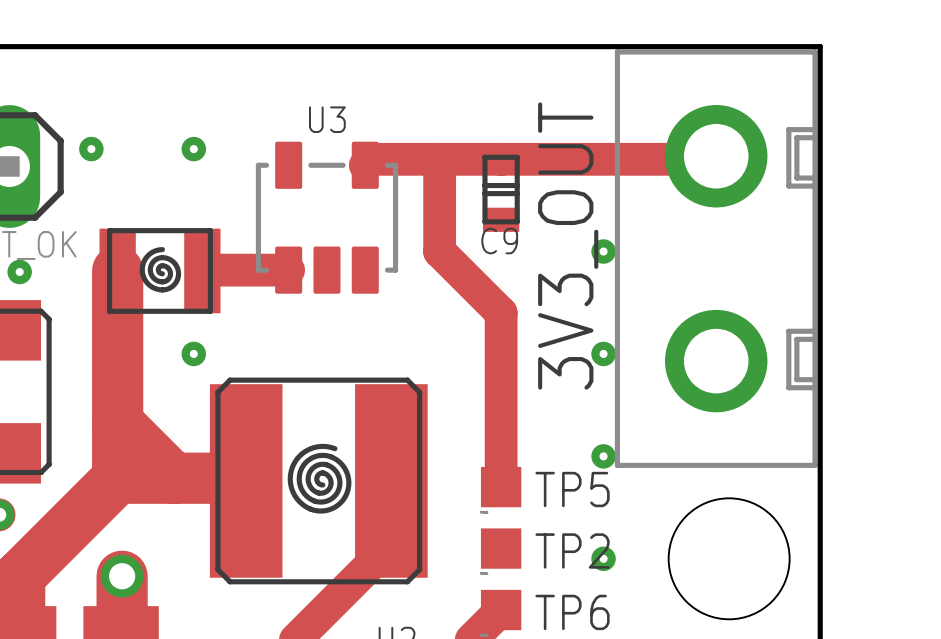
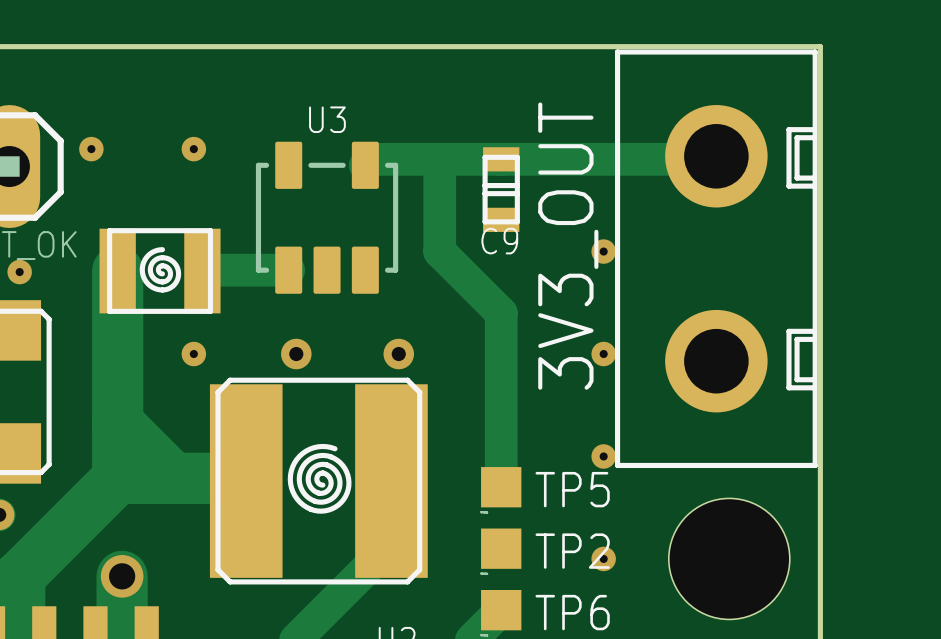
3V3_OUT footprint: [614, 49, 818, 468] -> [614, 49, 818, 469]
via: none -> (296, 354)
via: none -> (398, 354)

